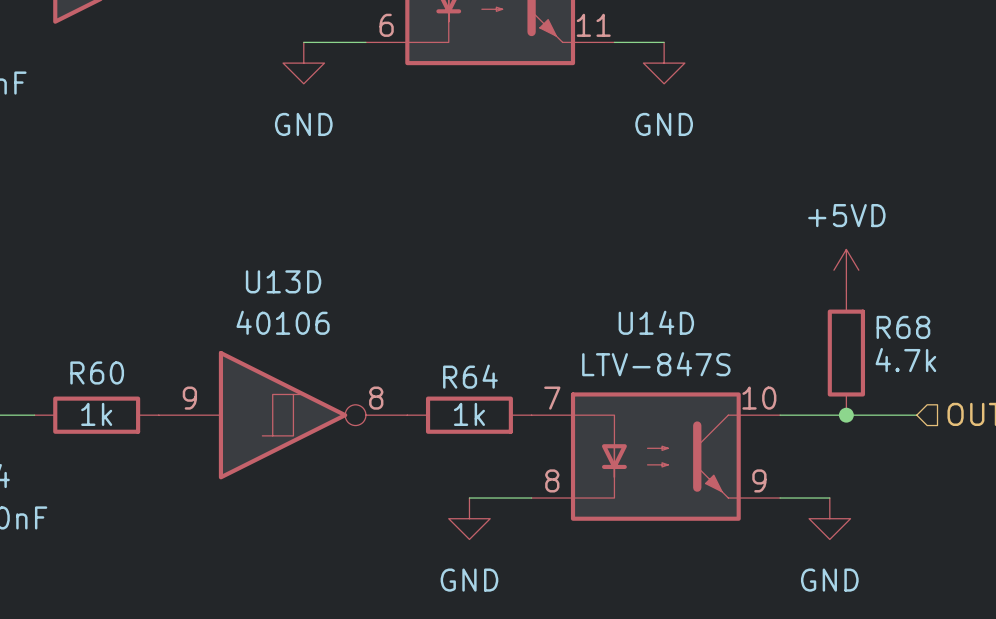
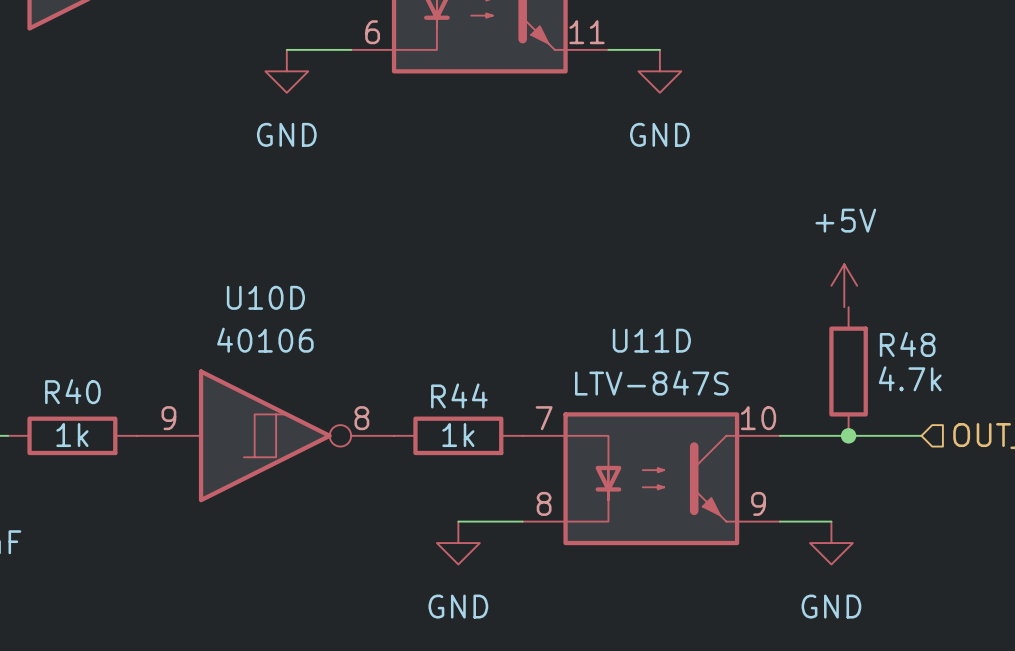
power symbol: +5VD (846, 270) -> +5V (844, 285)
U13D name: U13D (283, 281) -> U10D (265, 297)
U14D name: U14D (656, 322) -> U11D (651, 340)
R68 name: R68 (903, 327) -> R48 (907, 344)
R60 name: R60 (97, 372) -> R40 (72, 391)
R64 name: R64 (470, 376) -> R44 (459, 395)

